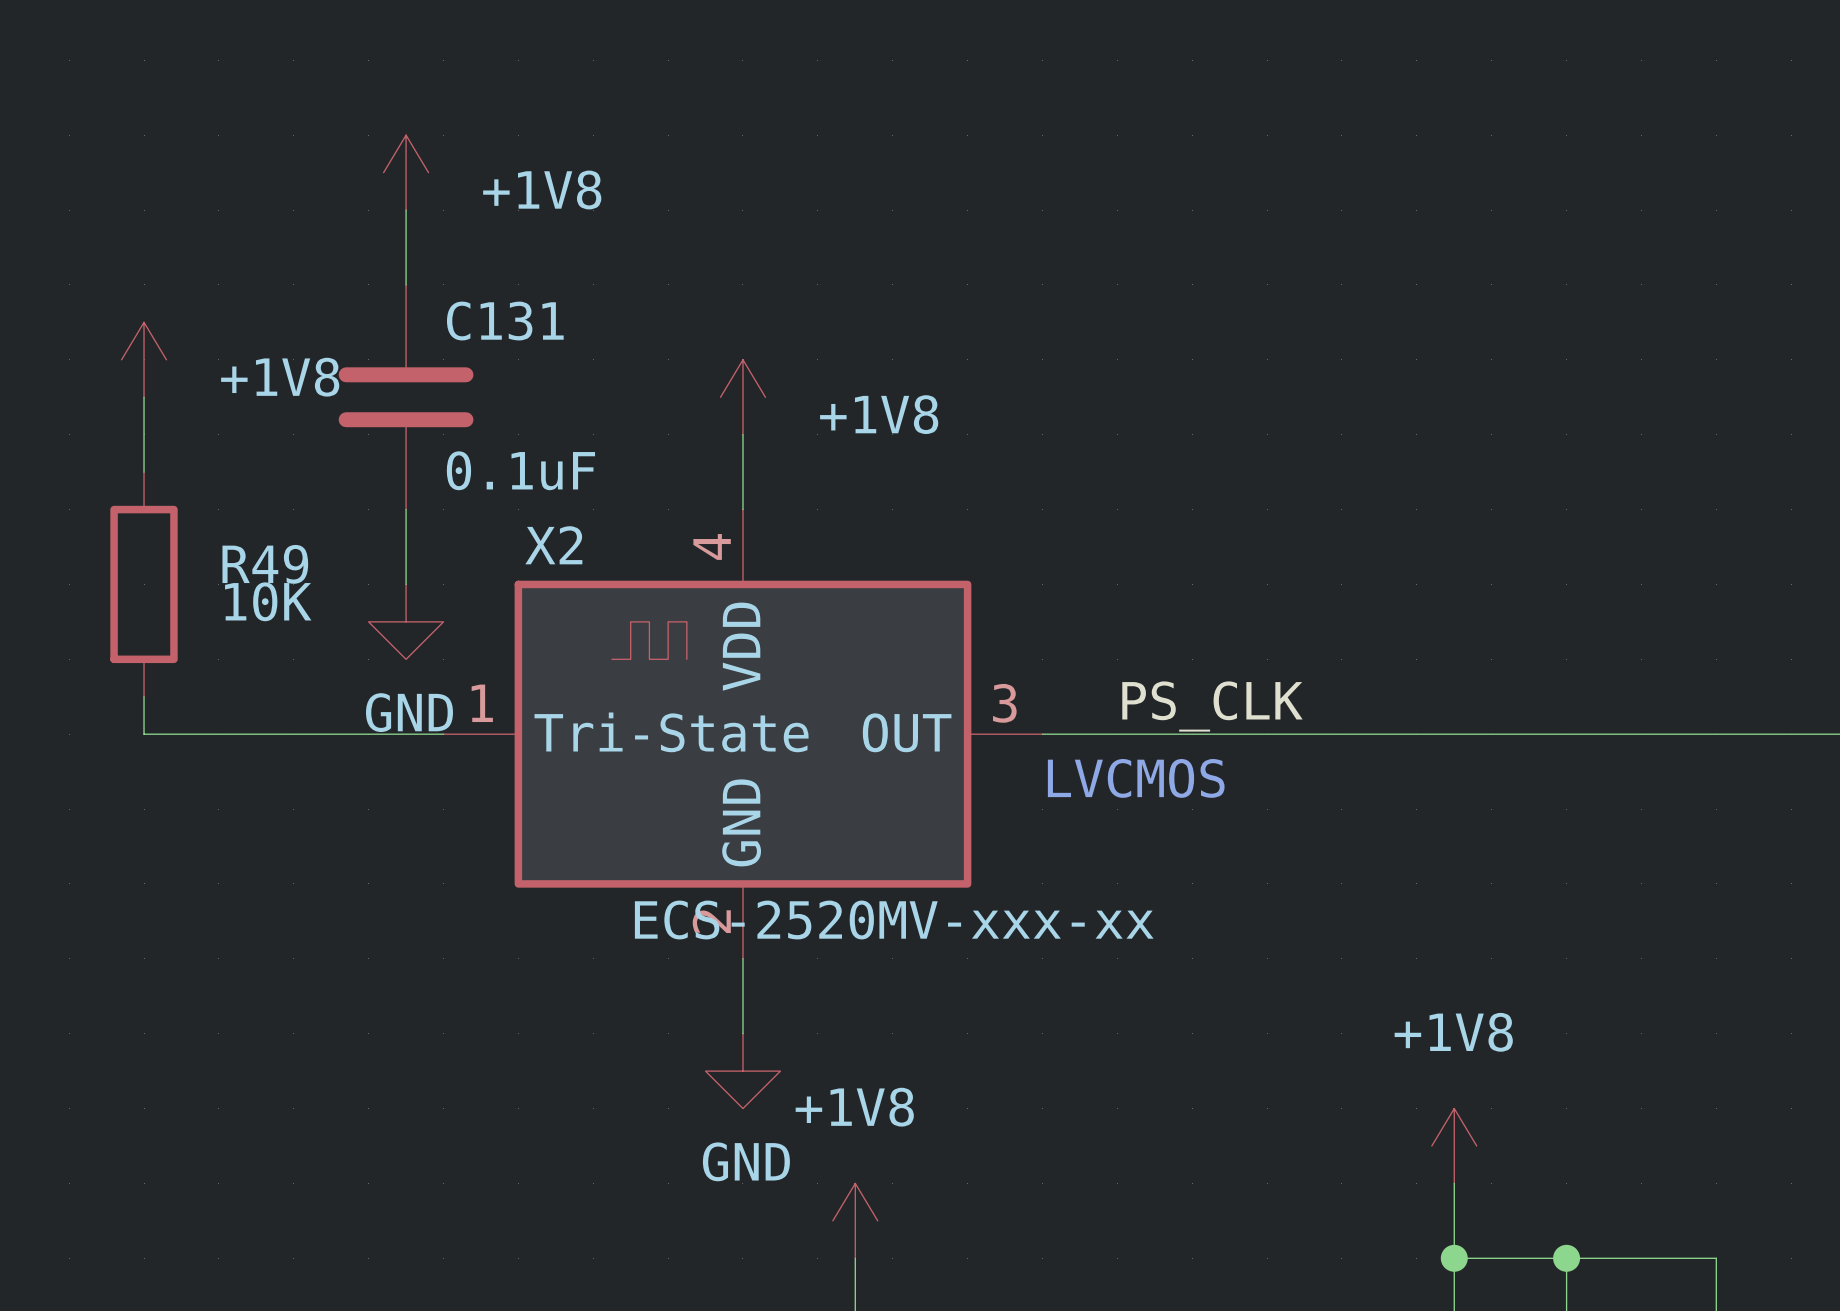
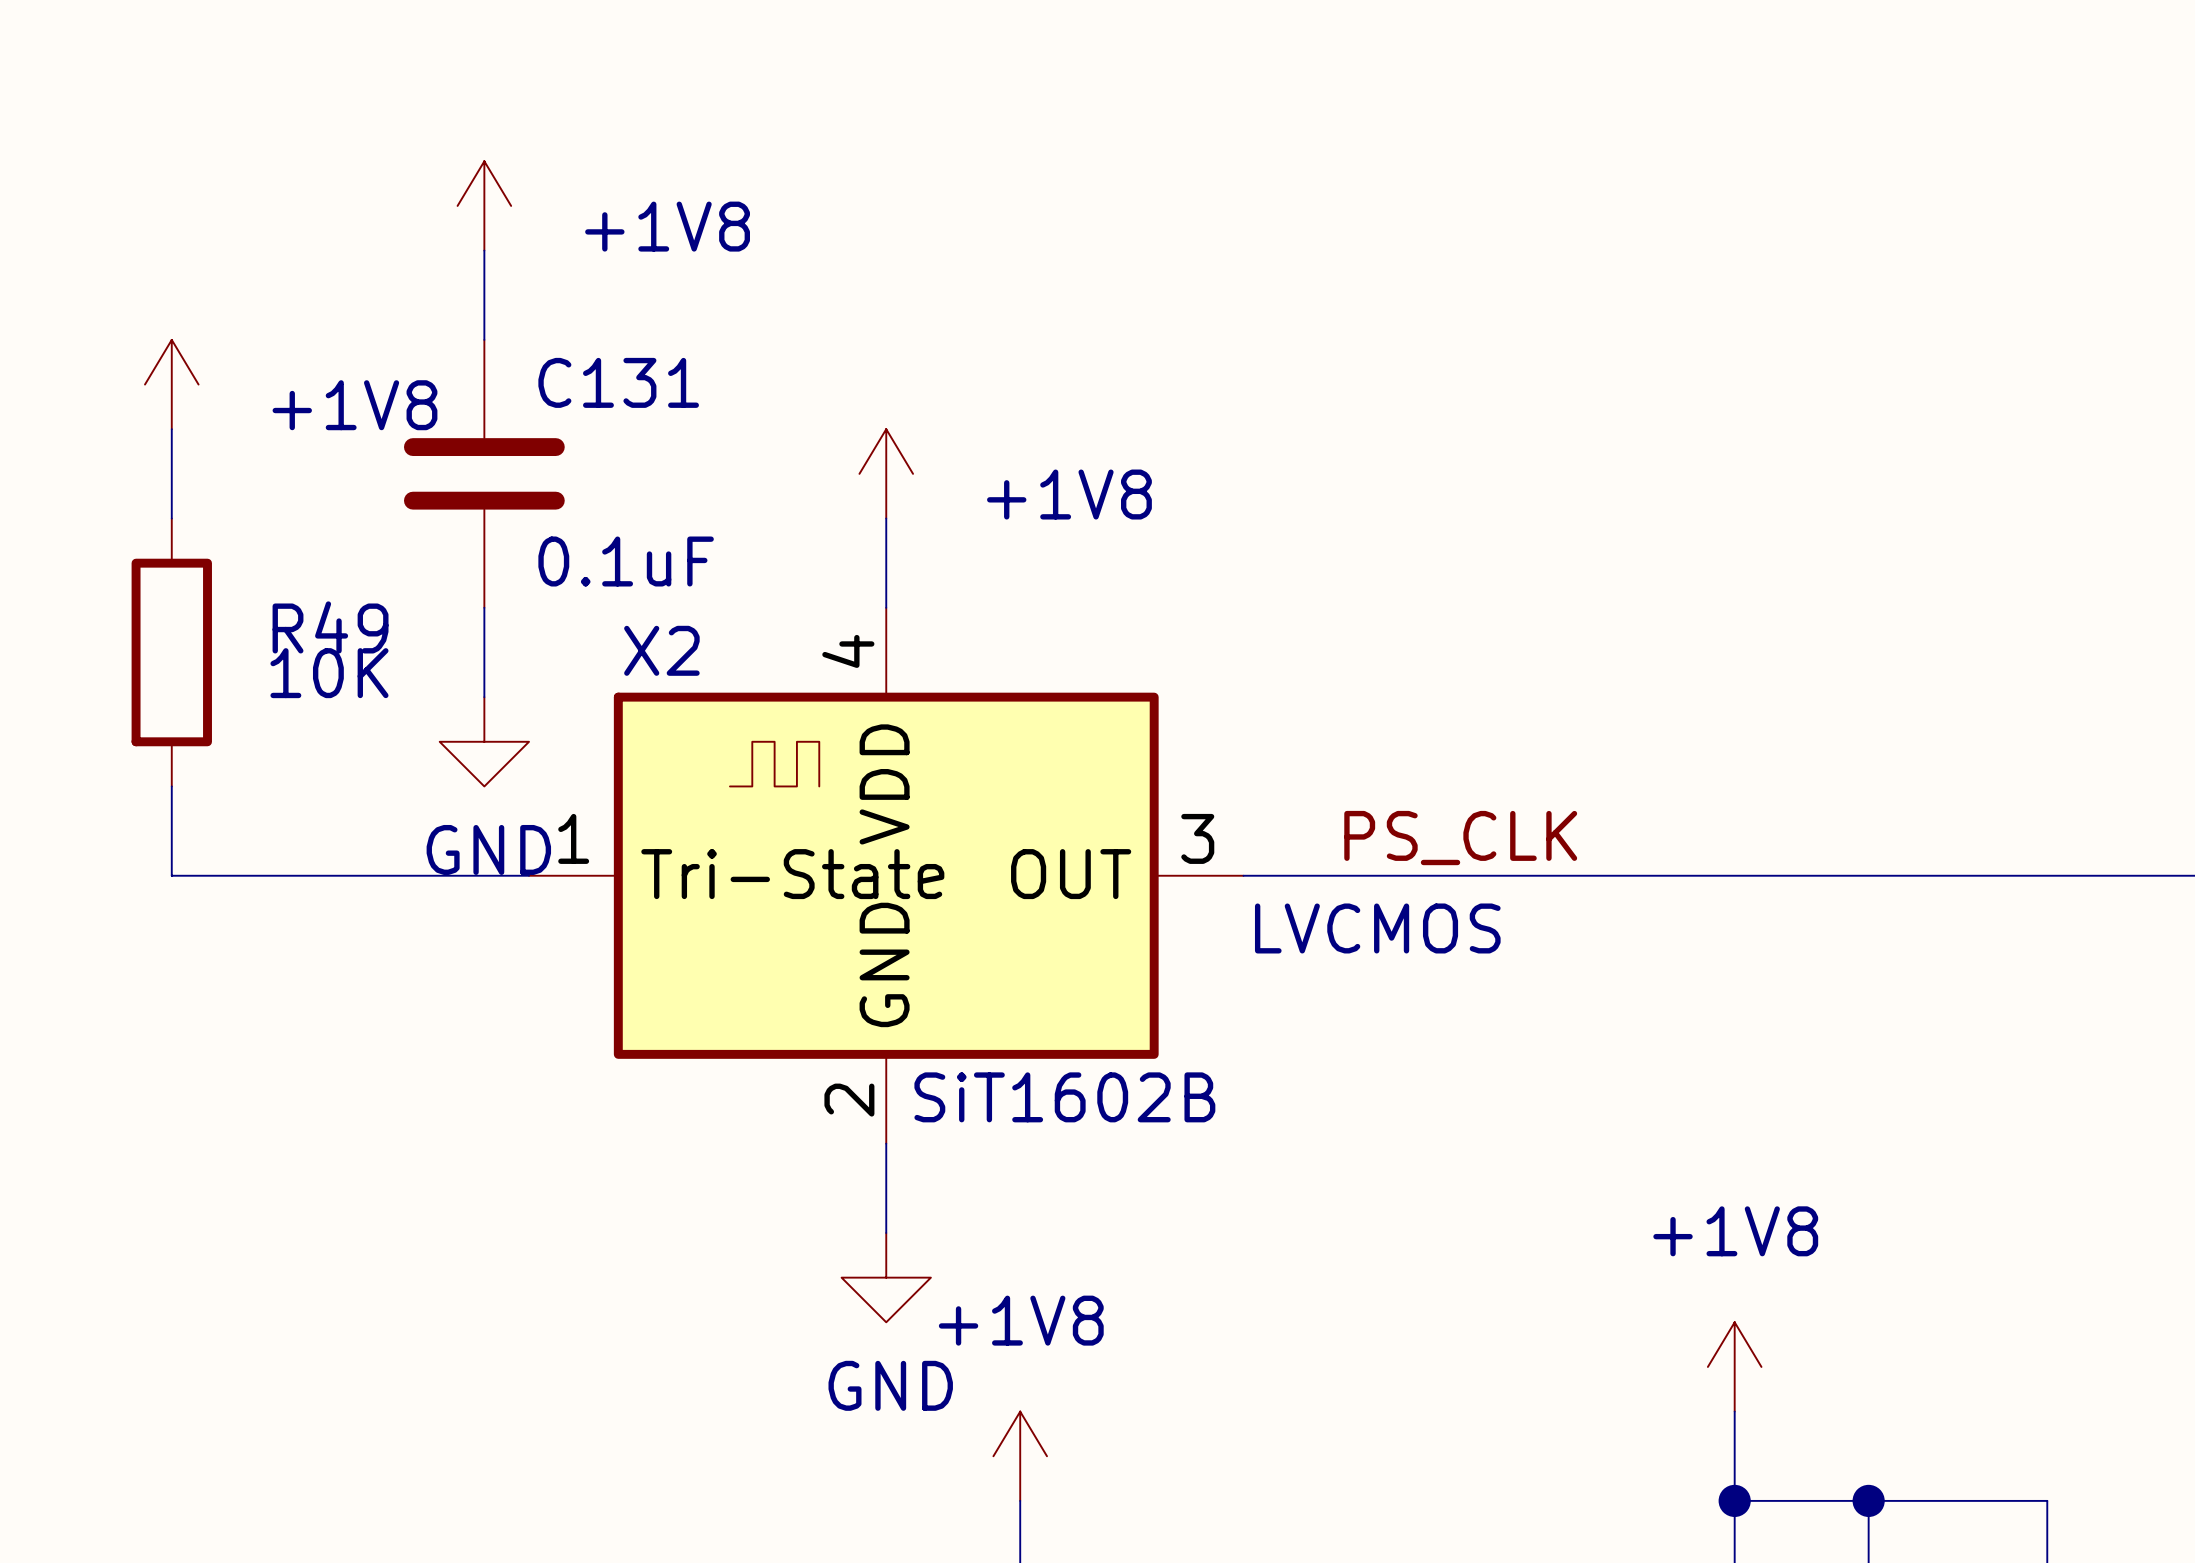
power symbol position: +1V8 (144, 359) -> +1V8 (171, 384)
R49 position: (144, 584) -> (171, 652)
X2 value: ECS-2520MV-xxx-xx (894, 920) -> SiT1602B (1064, 1097)

